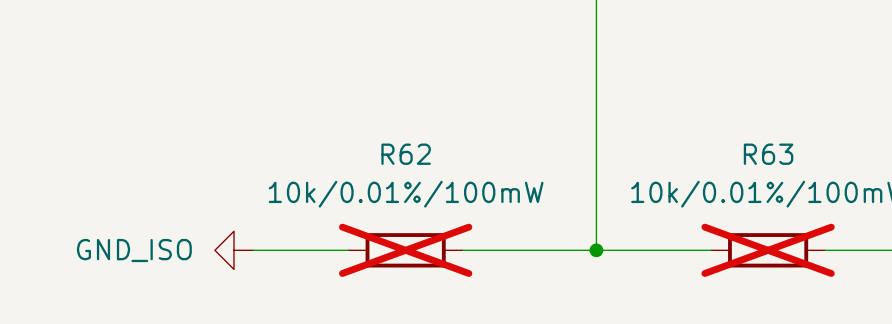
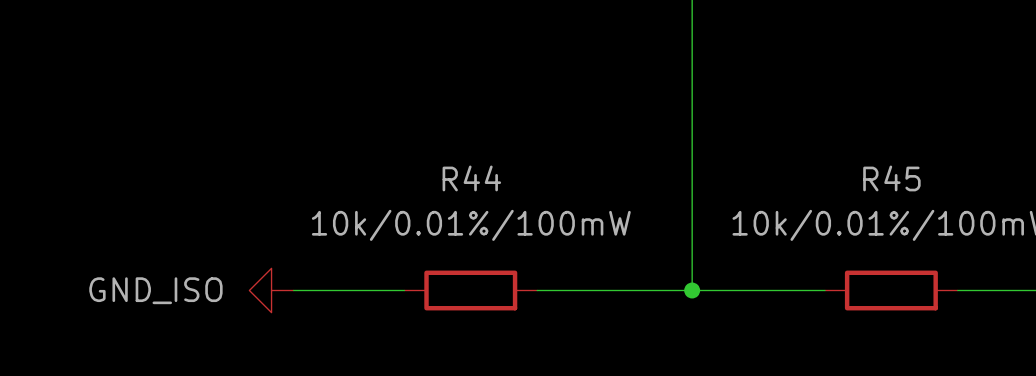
R62 name: R62 (406, 154) -> R44 (471, 178)
R63 name: R63 (768, 154) -> R45 (891, 178)
R62 do-not-place cross: (405, 250) -> none
R63 do-not-place cross: (768, 250) -> none

